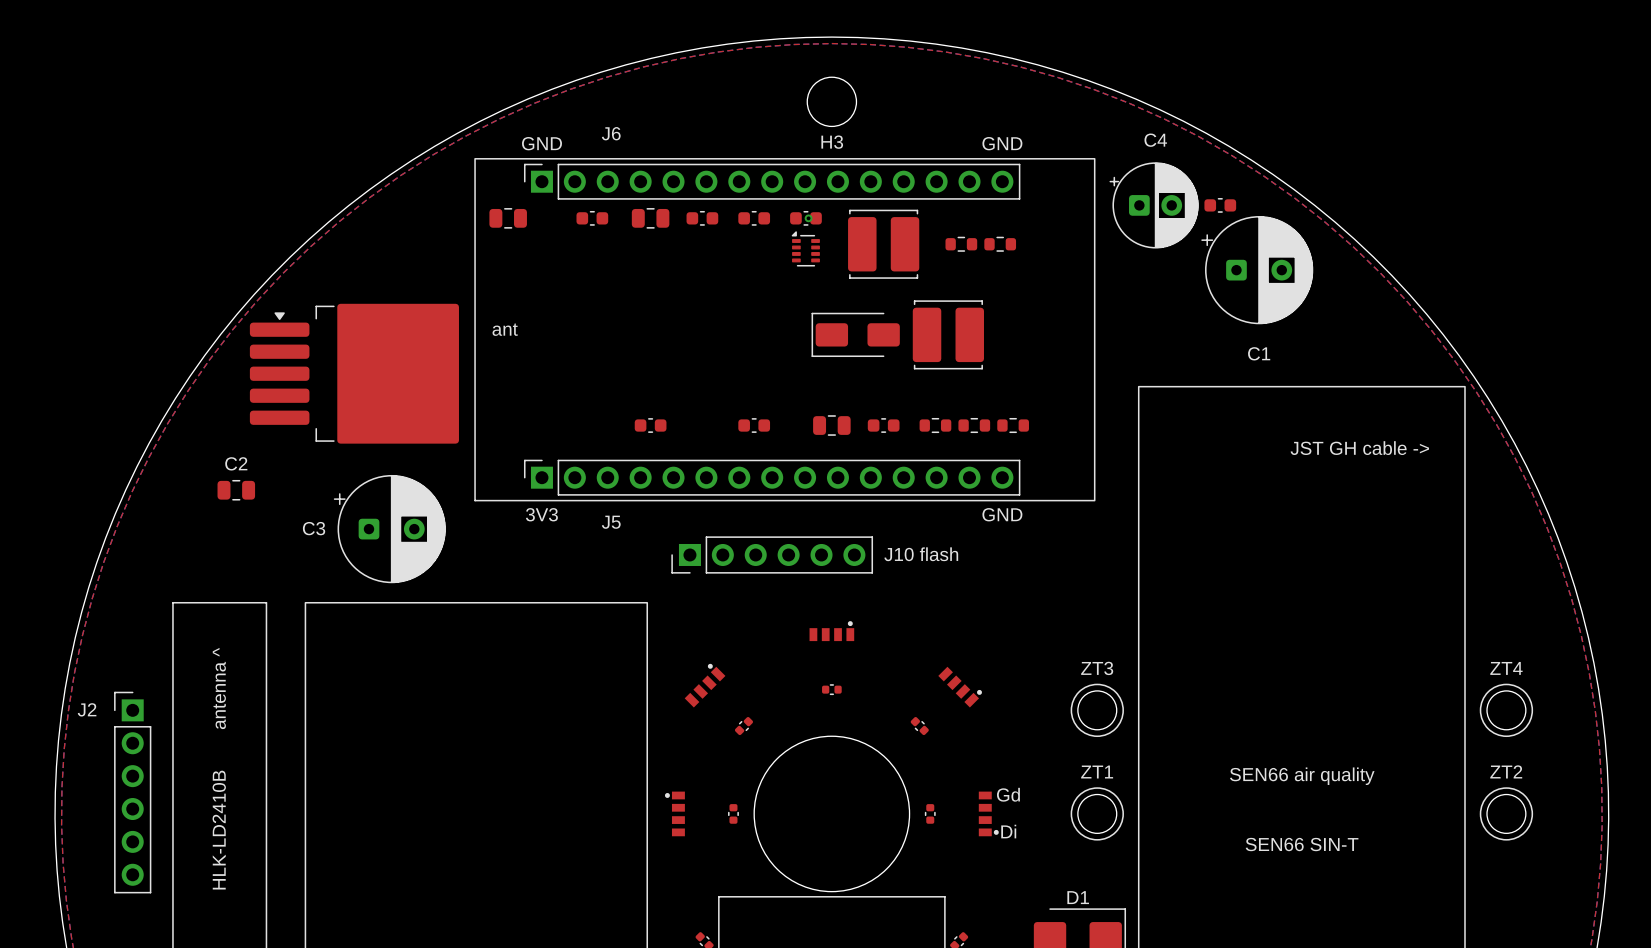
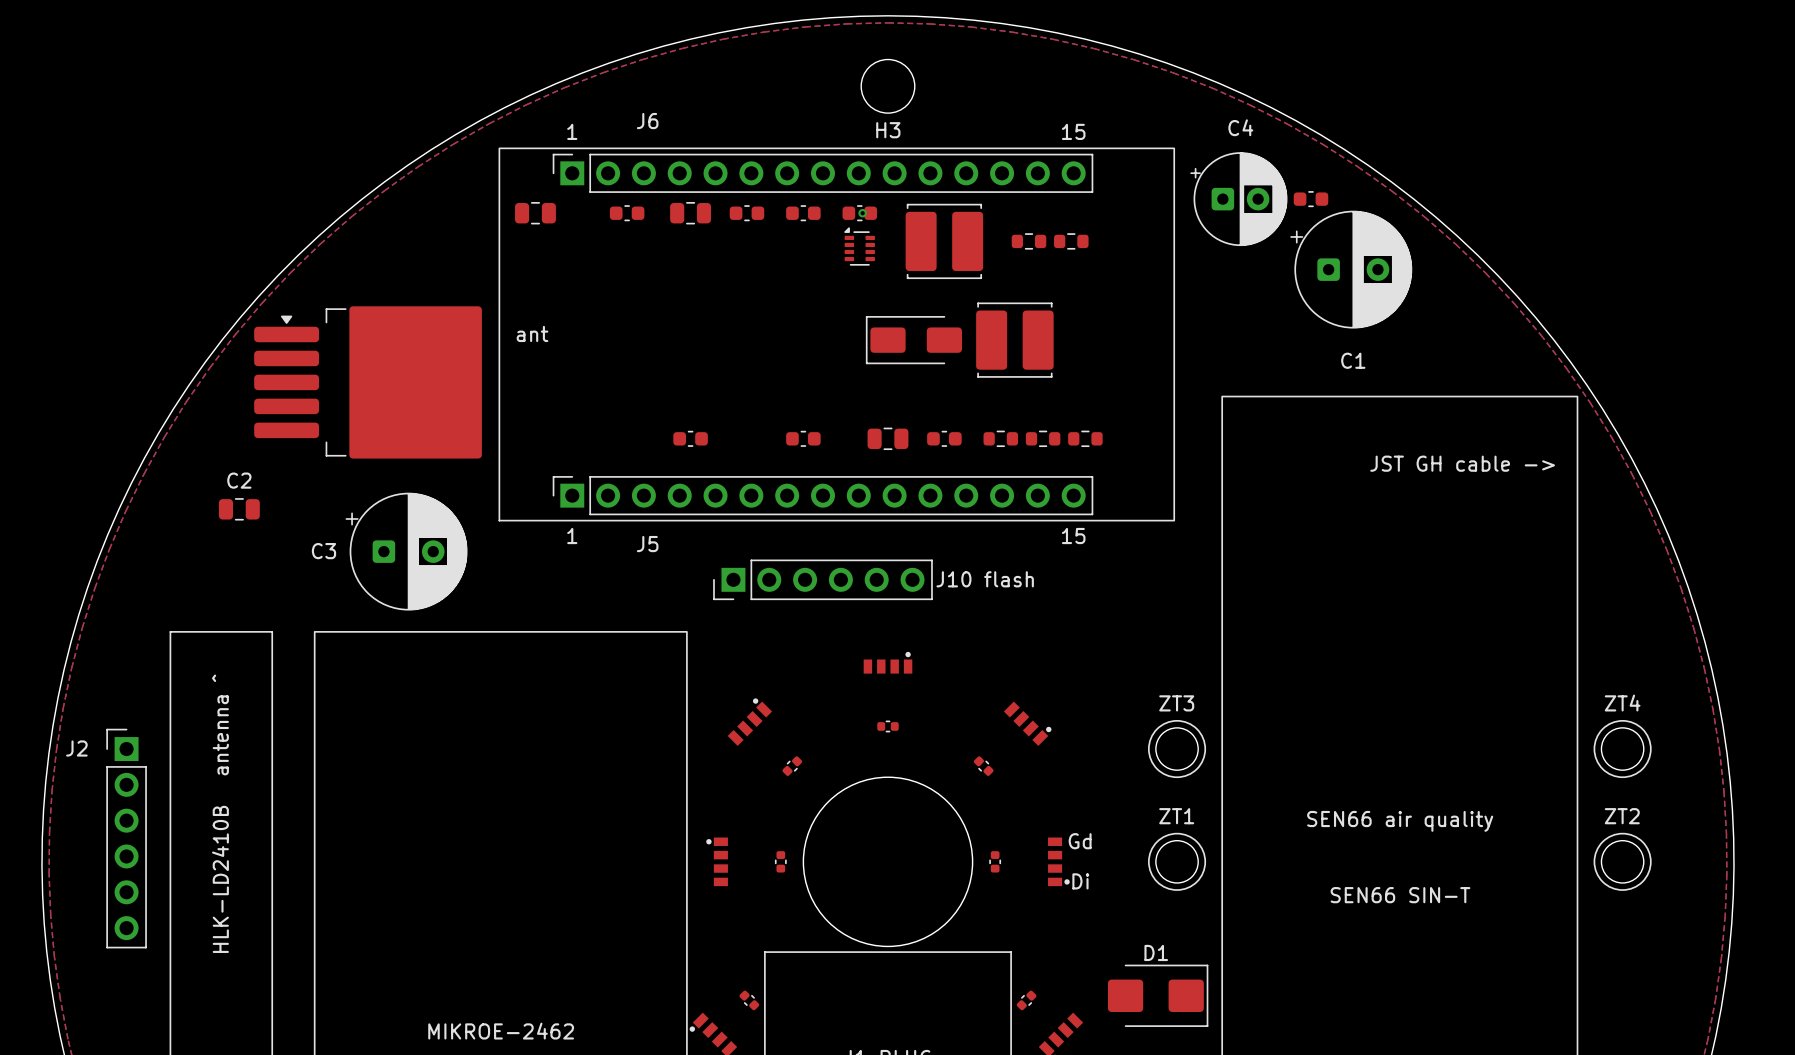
text: GND (542, 143) -> 1 (572, 131)
text: GND (1002, 143) -> 15 (1073, 131)
text: 3V3 (541, 514) -> 1 (572, 536)
text: GND (1002, 514) -> 15 (1073, 536)

